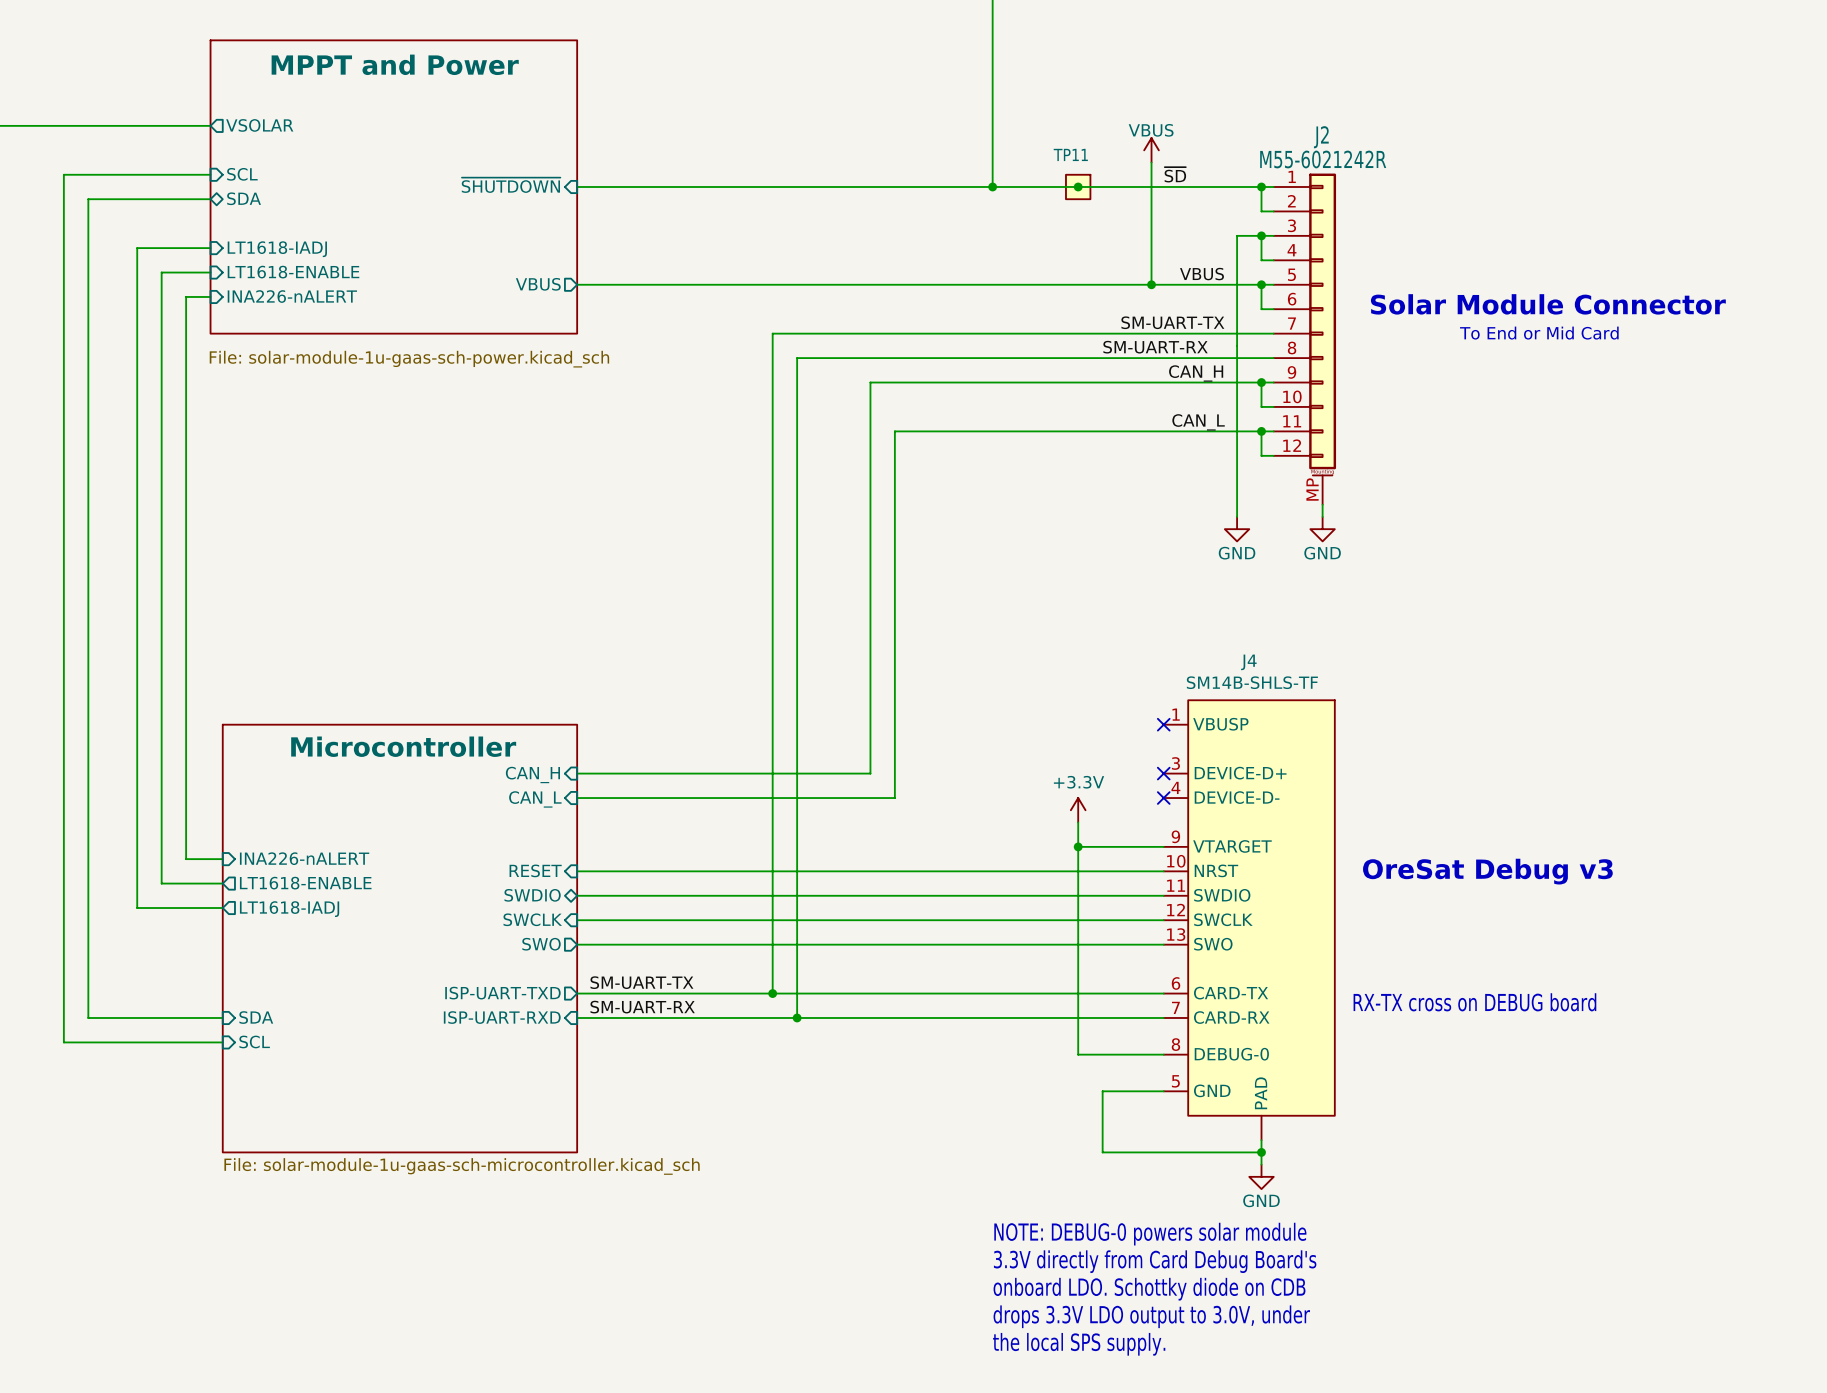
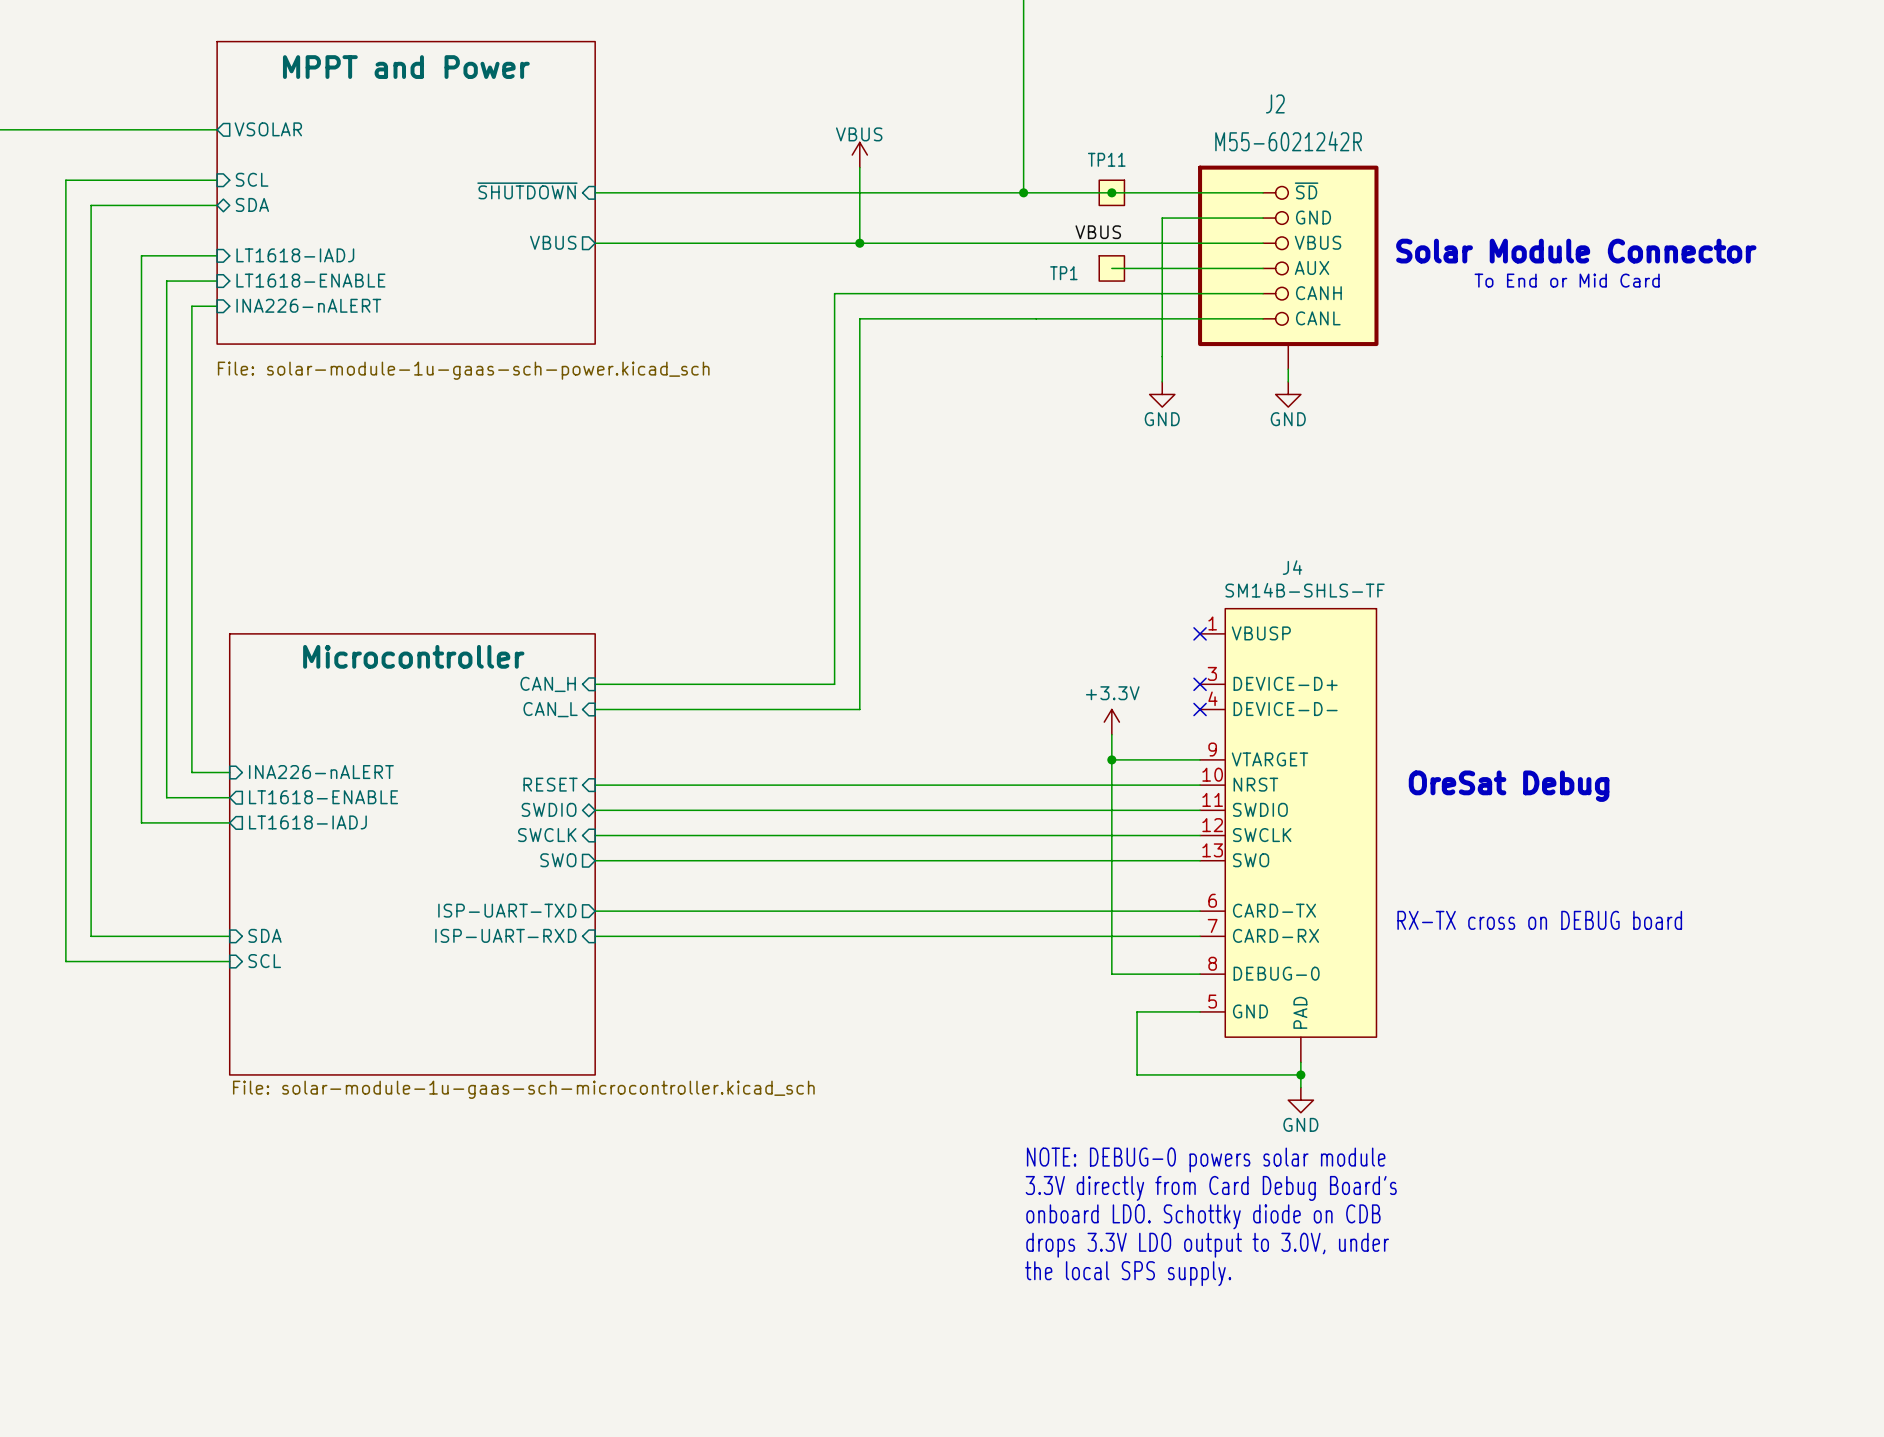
J2 name position: J2 (1321, 137) -> J2 (1275, 103)
power symbol: none -> VBUS (859, 155)
power symbol: VBUS (1151, 150) -> none
J2 value position: M55-6021242R (1323, 159) -> M55-6021242R (1288, 141)
wire: none -> (859, 167) (859, 243)
wire: (1151, 162) (1151, 284) -> none
J2 symbol: [1273, 173, 1337, 505] -> [1198, 165, 1379, 370]
label: ~{SD} (1175, 174) -> none
junction: (1261, 186) -> none
wire: none -> (1263, 218) (1162, 218) (1162, 381)
wire: none -> (595, 243) (1263, 243)
junction: none -> (859, 243)
junction: (1261, 235) -> none
wire: (1273, 235) (1237, 235) (1237, 516) -> none
wire: none -> (1111, 268) (1263, 268)
TP1: none -> (1111, 268)
label position: VBUS (1201, 274) -> VBUS (1098, 232)
sheet pin position: VBUS (538, 284) -> VBUS (553, 242)
wire: (577, 284) (809, 284) -> (595, 684) (834, 684) (834, 293)
junction: (1151, 284) -> none
junction: (1261, 284) -> none
text position: Solar Module Connector (1548, 304) -> Solar Module Connector (1576, 251)
wire: none -> (1263, 318) (859, 318) (859, 709) (595, 709)
label: SM-UART-TX (1172, 322) -> none
wire: (1273, 333) (772, 333) (772, 993) -> none
text position: To End or Mid Card (1539, 333) -> To End or Mid Card (1567, 280)
label: SM-UART-RX (1155, 347) -> none
wire: (1273, 358) (797, 358) (797, 1017) -> none
label: CAN_H (1196, 373) -> none
power symbol: none -> GND (1162, 394)
power symbol: none -> GND (1288, 394)
wire: (1261, 382) (1261, 406) (1273, 406) -> none
junction: (1261, 382) -> none
wire: (1273, 382) (870, 382) (870, 773) (577, 773) -> none
label: CAN_L (1198, 422) -> none
wire: (1261, 431) (1261, 455) (1273, 455) -> none
junction: (1261, 431) -> none
wire: (1273, 431) (894, 431) (894, 798) (577, 798) -> none
wire: (1322, 504) (1322, 516) -> (1288, 369) (1288, 381)
power symbol: GND (1237, 529) -> none
power symbol: GND (1322, 529) -> none
no-connect mark: none -> (1200, 633)
no-connect mark: none -> (1200, 684)
no-connect mark: none -> (1200, 709)
wire: none -> (1111, 734) (1111, 848)
no-connect mark: (1163, 724) -> none
junction: none -> (1111, 759)
wire: (186, 749) (186, 859) (222, 859) -> (191, 772) (229, 772)
text: none -> OreSat Debug (1509, 786)
wire: (161, 773) (161, 883) (222, 883) -> (166, 797) (229, 797)
no-connect mark: (1163, 773) -> none
sheet pin position: CAN_H (532, 774) -> CAN_H (548, 684)
wire: (137, 798) (137, 908) -> (91, 936) (141, 936)
wire: none -> (141, 822) (229, 822)
no-connect mark: (1163, 798) -> none
sheet pin: none -> LT1618-IADJ (307, 822)
sheet pin position: CAN_L (535, 799) -> CAN_L (550, 709)
power symbol position: +3.3V (1078, 810) -> +3.3V (1111, 722)
wire: none -> (595, 860) (1200, 860)
wire: (1078, 846) (1163, 846) -> (1111, 759) (1200, 759)
junction: (1078, 846) -> none
sheet pin position: INA226-nALERT (304, 858) -> INA226-nALERT (321, 772)
sheet pin position: RESET (535, 870) -> RESET (550, 784)
wire: (577, 871) (1163, 871) -> (595, 785) (1200, 785)
text: OreSat Debug v3 (1487, 871) -> none
sheet pin position: LT1618-ENABLE (305, 883) -> LT1618-ENABLE (323, 797)
sheet pin position: SWDIO (532, 895) -> SWDIO (549, 809)
wire: (577, 895) (1163, 895) -> (595, 810) (1200, 810)
wire: (88, 908) (88, 1017) (222, 1017) -> none
sheet pin shape: output (289, 909) -> input (265, 935)
sheet pin: LT1618-IADJ (289, 909) -> SDA (265, 935)
sheet pin position: SWCLK (532, 919) -> SWCLK (547, 835)
wire: (577, 920) (1163, 920) -> (595, 835) (1200, 835)
J4 position: (1249, 920) -> (1288, 835)
wire: (63, 932) (63, 1042) (222, 1042) -> (65, 961) (229, 961)
sheet Microcontroller position: (399, 938) -> (412, 854)
sheet pin position: SWO (541, 944) -> SWO (558, 860)
wire: (577, 944) (1078, 944) (1078, 1054) (1163, 1054) -> none
label: SM-UART-TX (641, 982) -> none
sheet pin position: ISP-UART-TXD (502, 993) -> ISP-UART-TXD (507, 910)
wire: (577, 993) (1163, 993) -> (595, 911) (1200, 911)
junction: (772, 993) -> none
text position: RX-TX cross on DEBUG board (1474, 1002) -> RX-TX cross on DEBUG board (1539, 920)
label: SM-UART-RX (642, 1007) -> none
sheet pin: SDA (256, 1017) -> none
sheet pin position: ISP-UART-RXD (502, 1017) -> ISP-UART-RXD (505, 935)
wire: (577, 1017) (1163, 1017) -> (595, 936) (1200, 936)
junction: (797, 1017) -> none
sheet pin position: SCL (254, 1041) -> SCL (264, 961)
junction: none -> (1300, 1074)
wire: (1163, 1091) (1102, 1091) (1102, 1152) (1261, 1152) -> (1200, 1011) (1137, 1011) (1137, 1074) (1300, 1074)
text: none -> NOTE: DEBUG-0 powers solar module (1206, 1160)
junction: (1261, 1152) -> none
power symbol position: GND (1261, 1176) -> GND (1300, 1100)
text: NOTE: DEBUG-0 powers solar module (1150, 1234) -> the local SPS supply. (1128, 1273)
text position: 3.3V directly from Card Debug Board's (1155, 1261) -> 3.3V directly from Card Debug Board's (1211, 1188)
text position: onboard LDO. Schottky diode on CDB (1149, 1289) -> onboard LDO. Schottky diode on CDB (1203, 1216)
text position: drops 3.3V LDO output to 3.0V, under (1151, 1316) -> drops 3.3V LDO output to 3.0V, under (1207, 1245)
text: the local SPS supply. (1079, 1344) -> none

